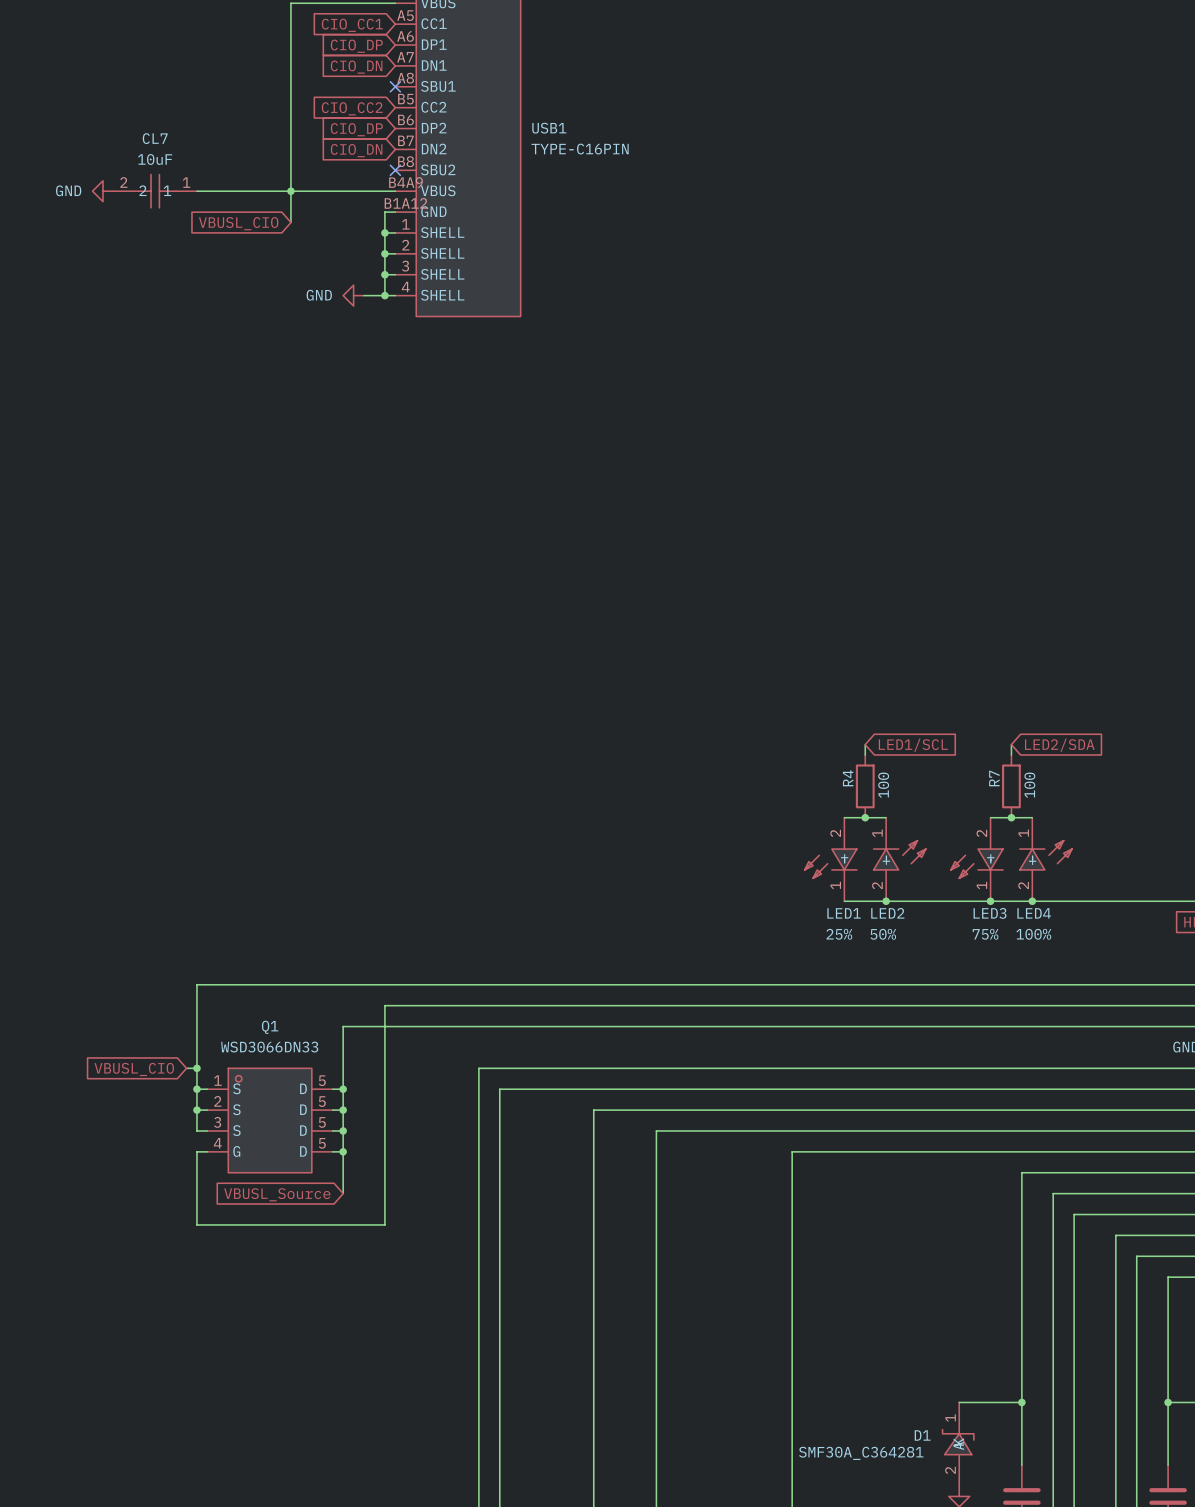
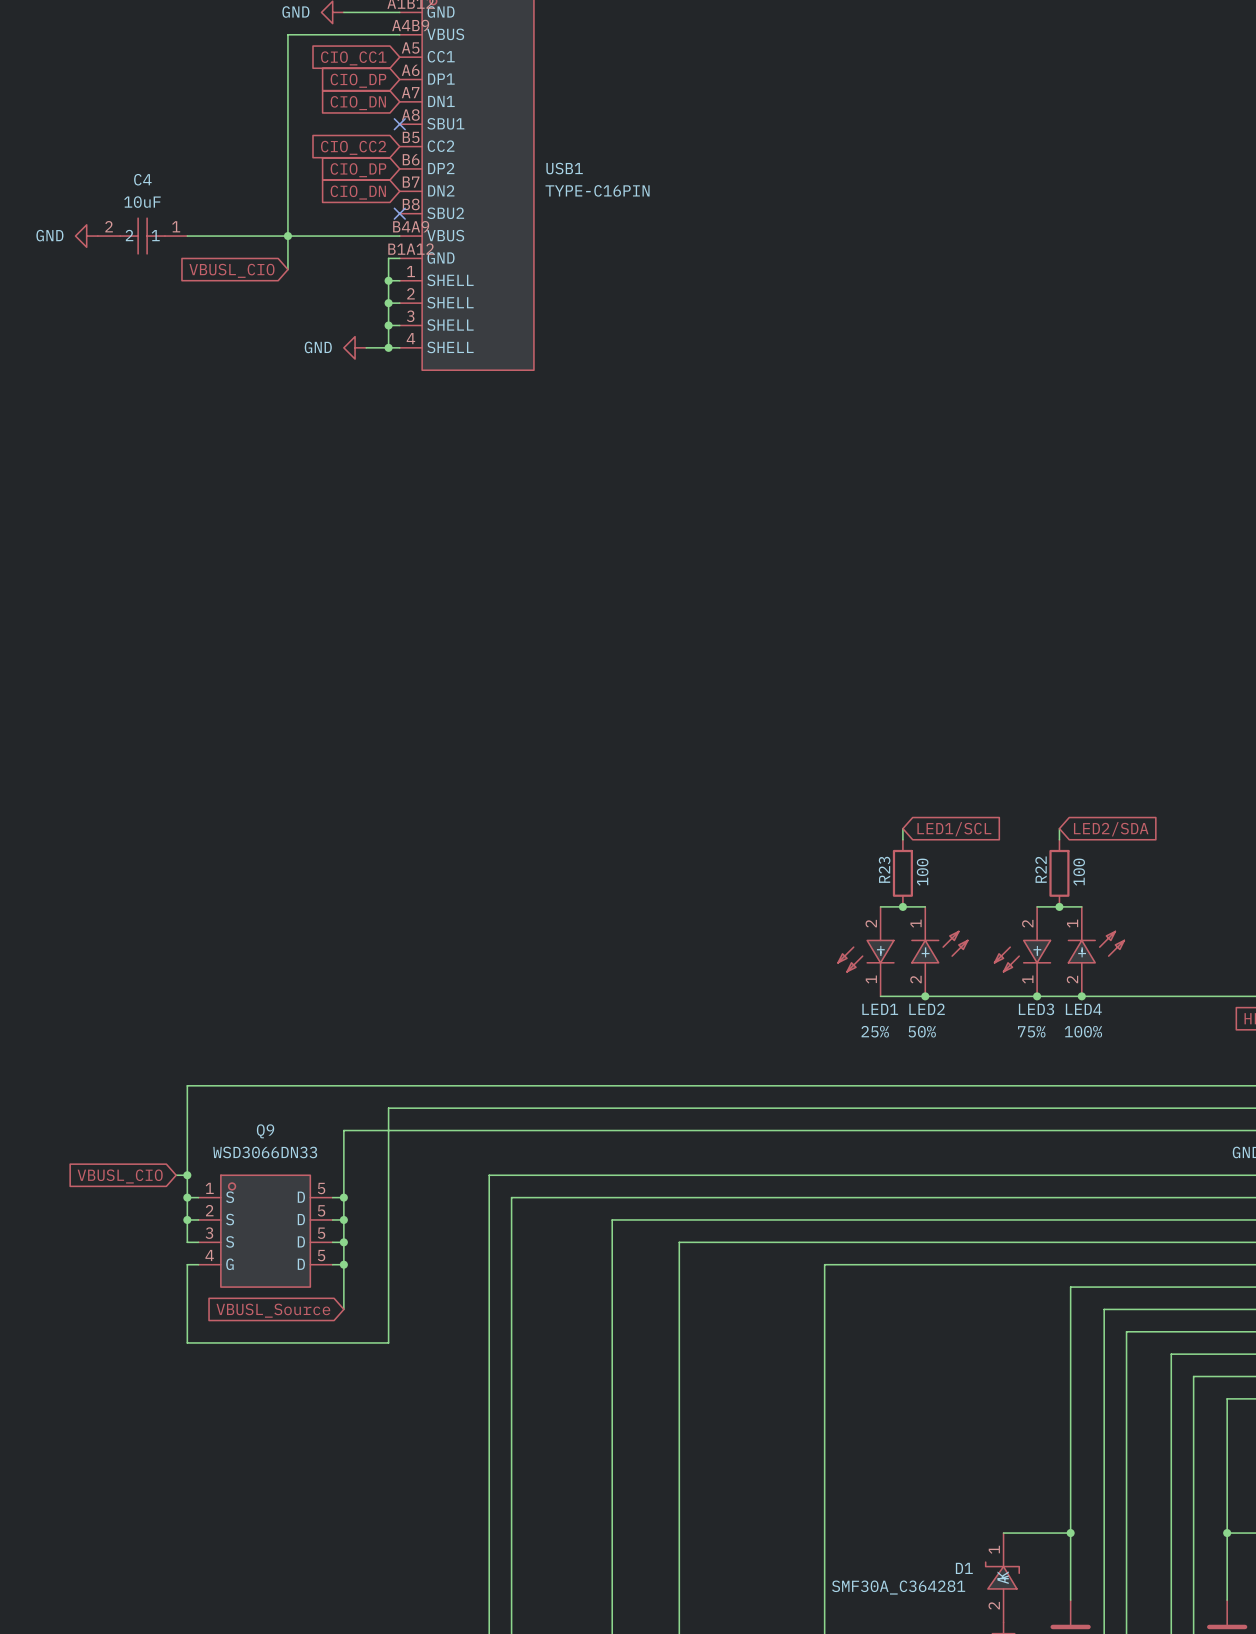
CL7 name: CL7 (155, 138) -> C4 (142, 179)
R4 name: R4 (848, 778) -> R23 (884, 869)
R7 name: R7 (994, 778) -> R22 (1041, 869)
Q1 name: Q1 (270, 1027) -> Q9 (265, 1131)

